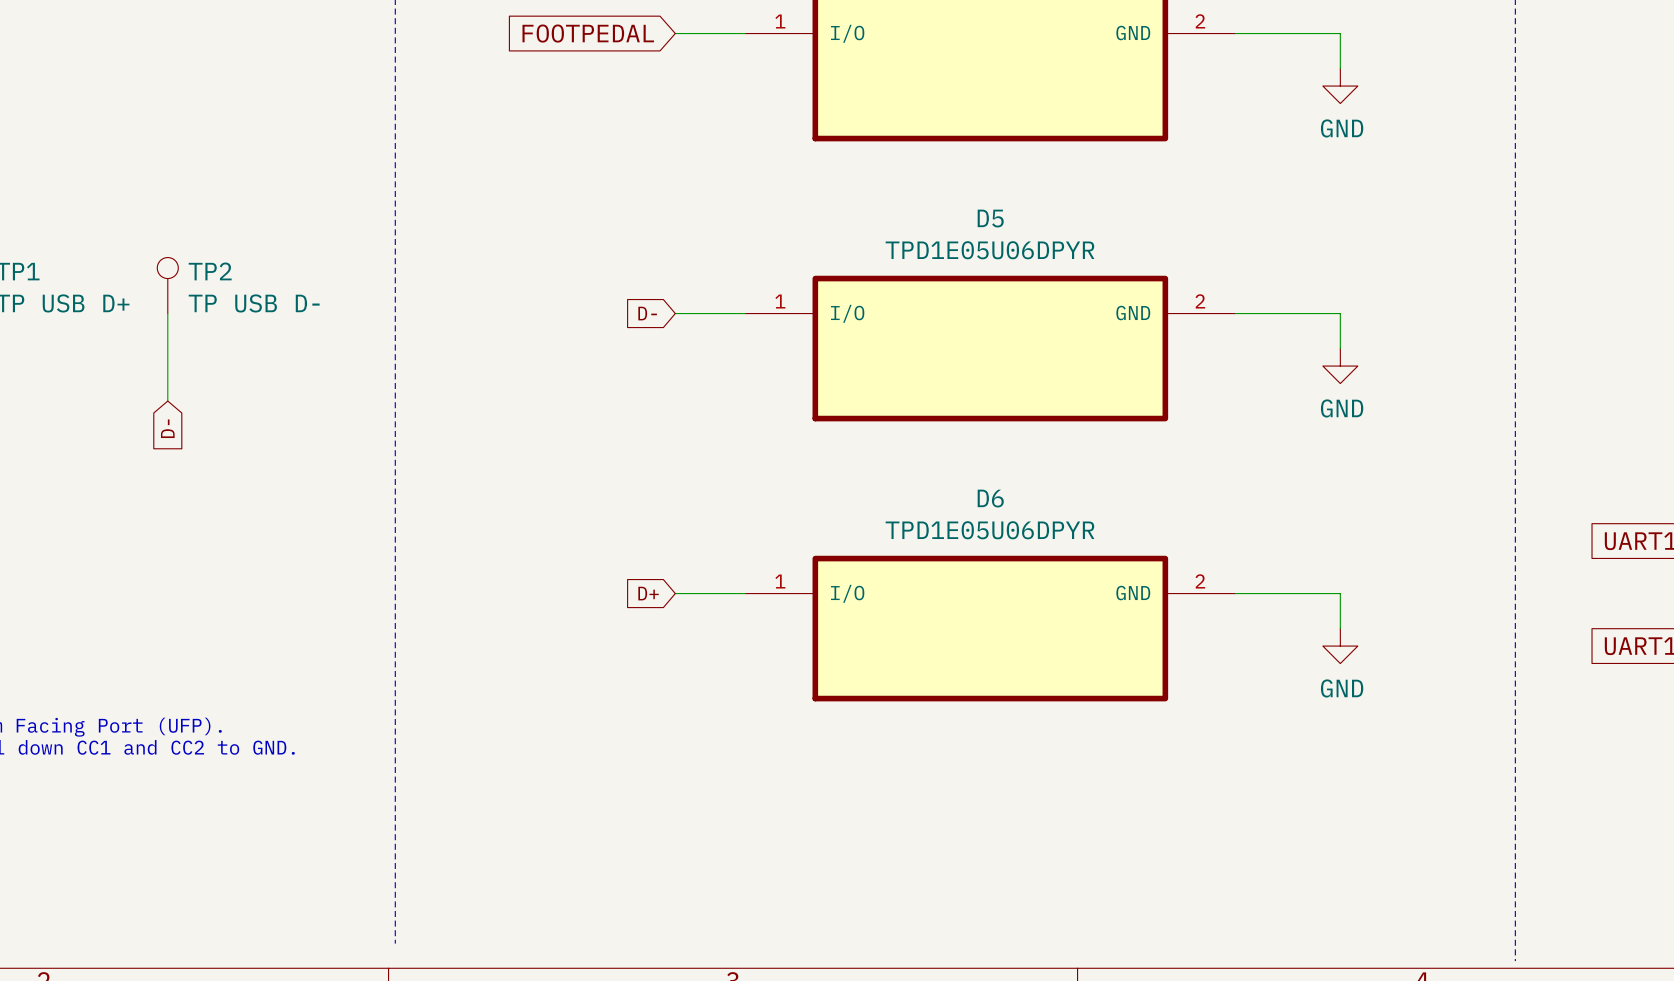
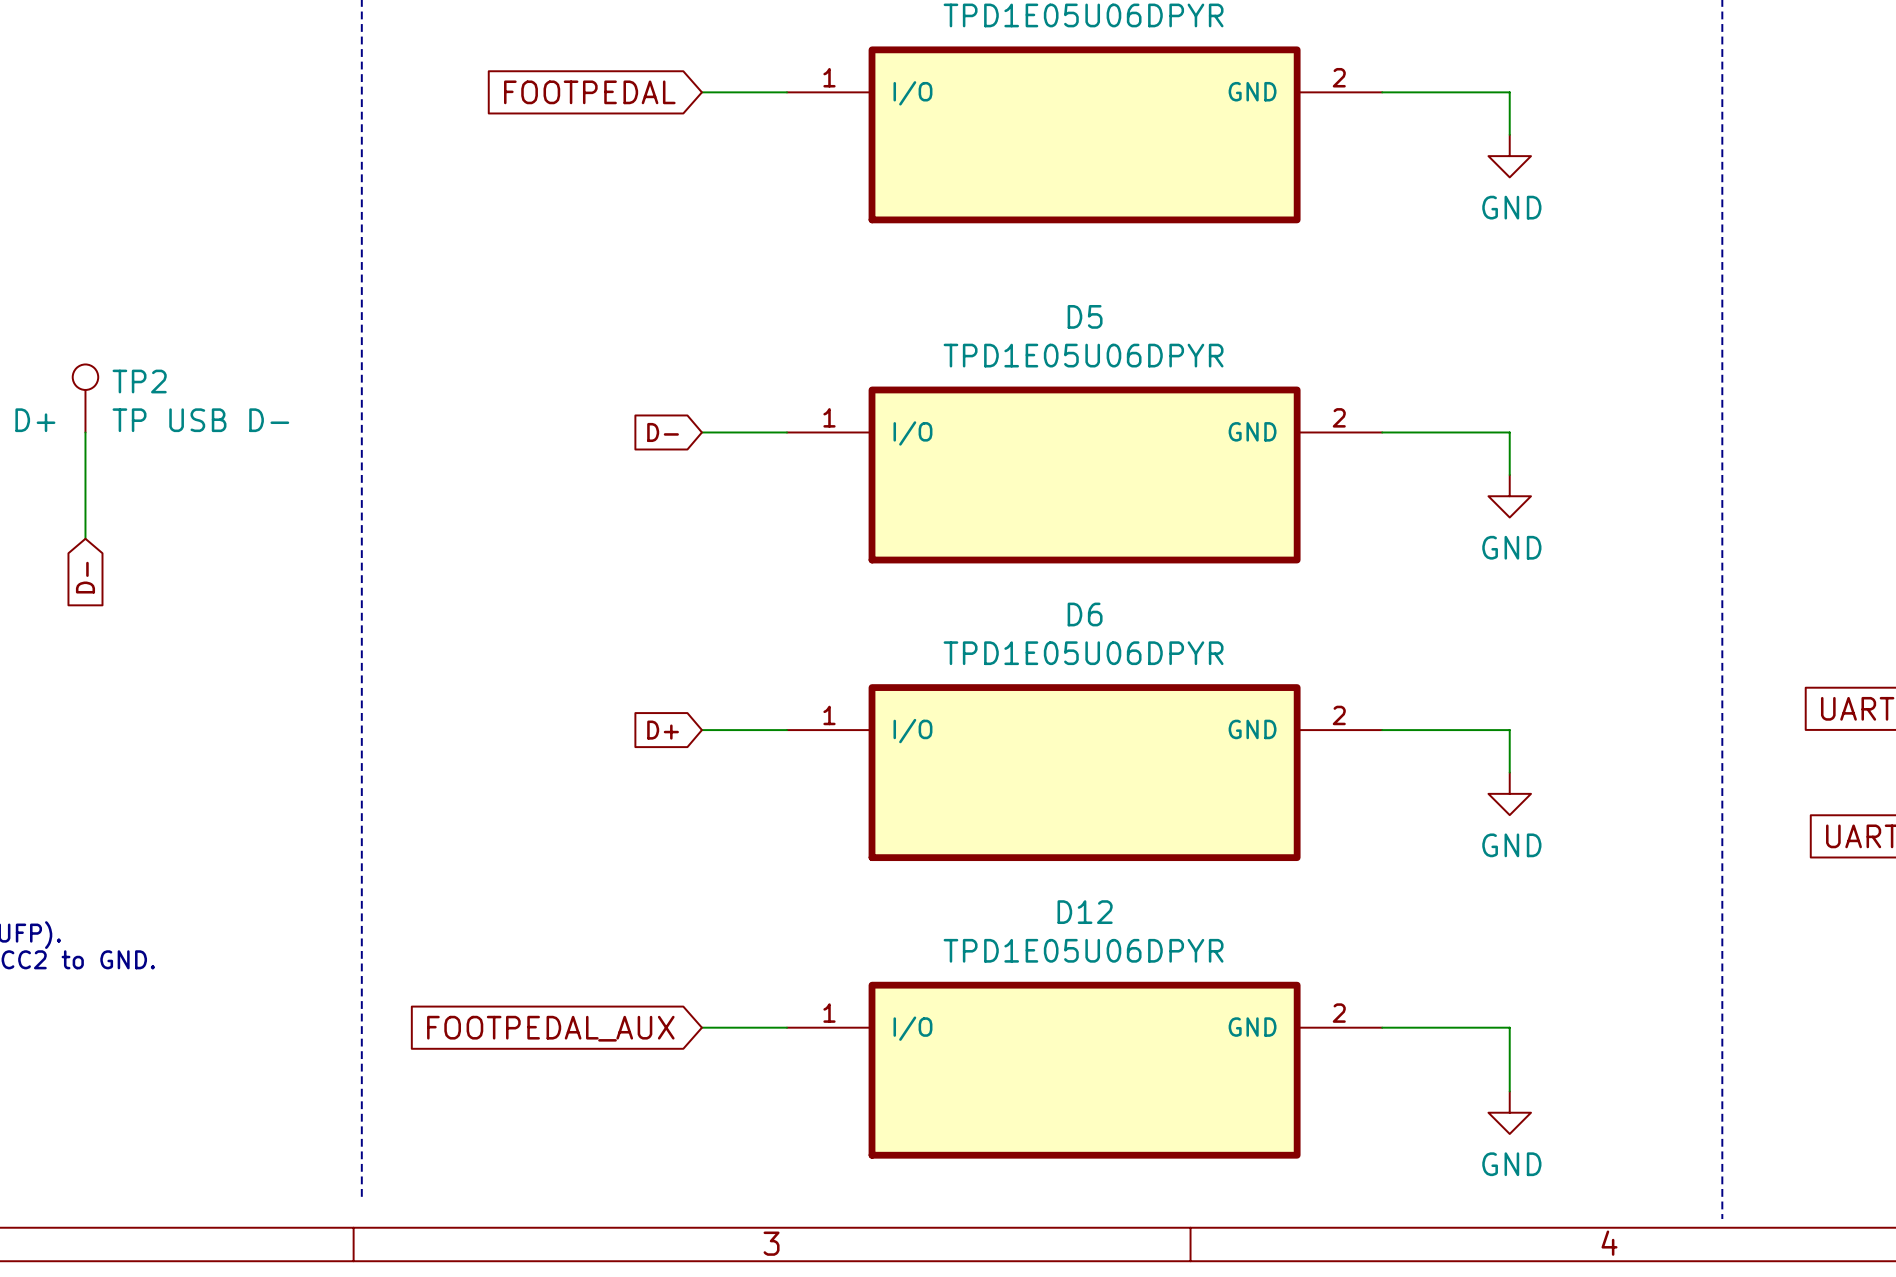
global label position: D+ (648, 593) -> D+ (663, 730)
wire: (675, 593) (745, 593) -> (701, 730) (786, 730)
wire: (1235, 593) (1340, 593) (1340, 628) -> (1382, 730) (1509, 730) (1509, 772)
D6 position: (990, 628) -> (1084, 772)
power symbol position: GND (1340, 646) -> GND (1509, 793)
wire: none -> (701, 1027) (786, 1027)
wire: none -> (1382, 1027) (1509, 1027) (1509, 1091)
global label: none -> FOOTPEDAL_AUX (550, 1028)
D12: none -> TPD1E05U06DPYR (1084, 1070)
power symbol: none -> GND (1509, 1112)

